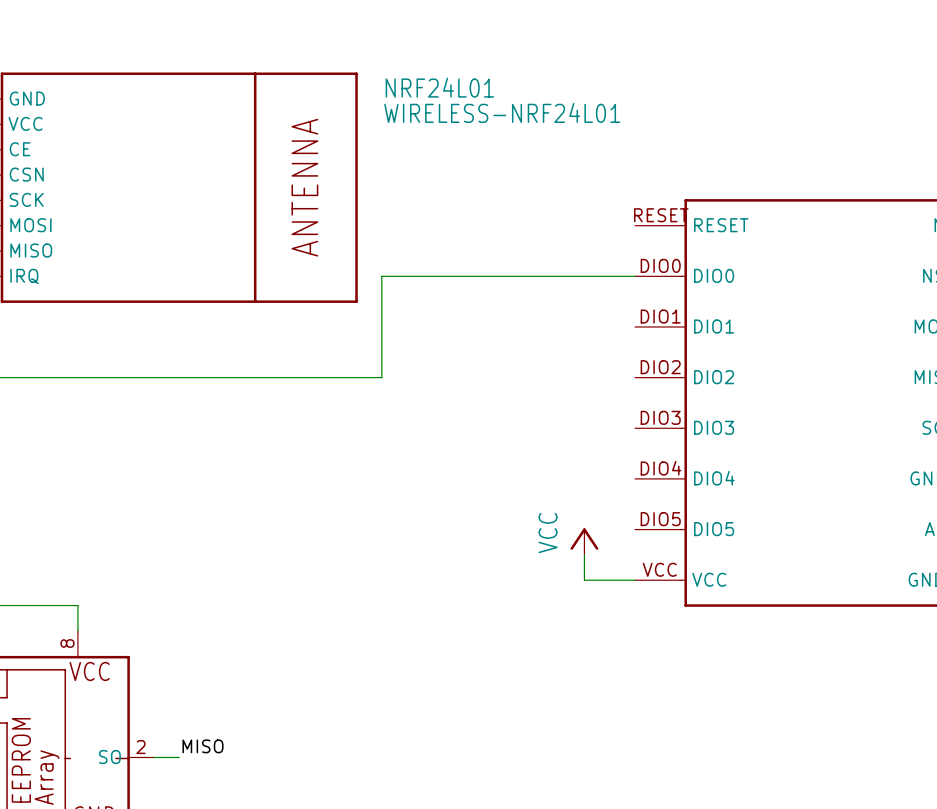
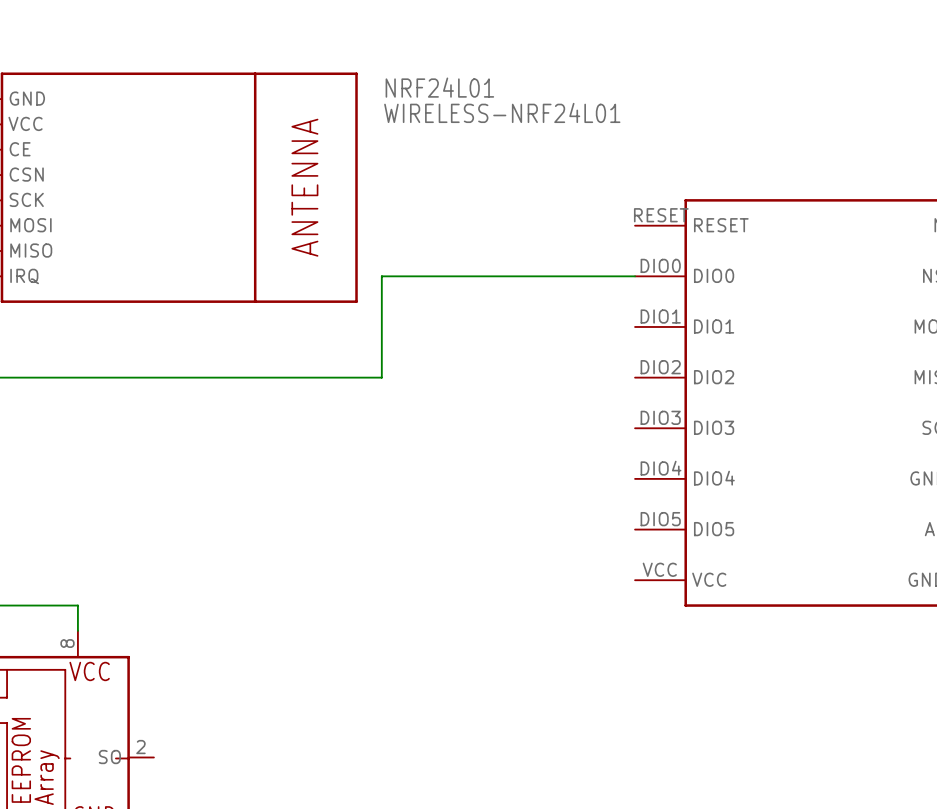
power symbol: VCC (584, 541) -> none
wire: (584, 554) (584, 580) (635, 580) -> none
label: MISO (202, 746) -> none
wire: (153, 757) (179, 757) -> none

